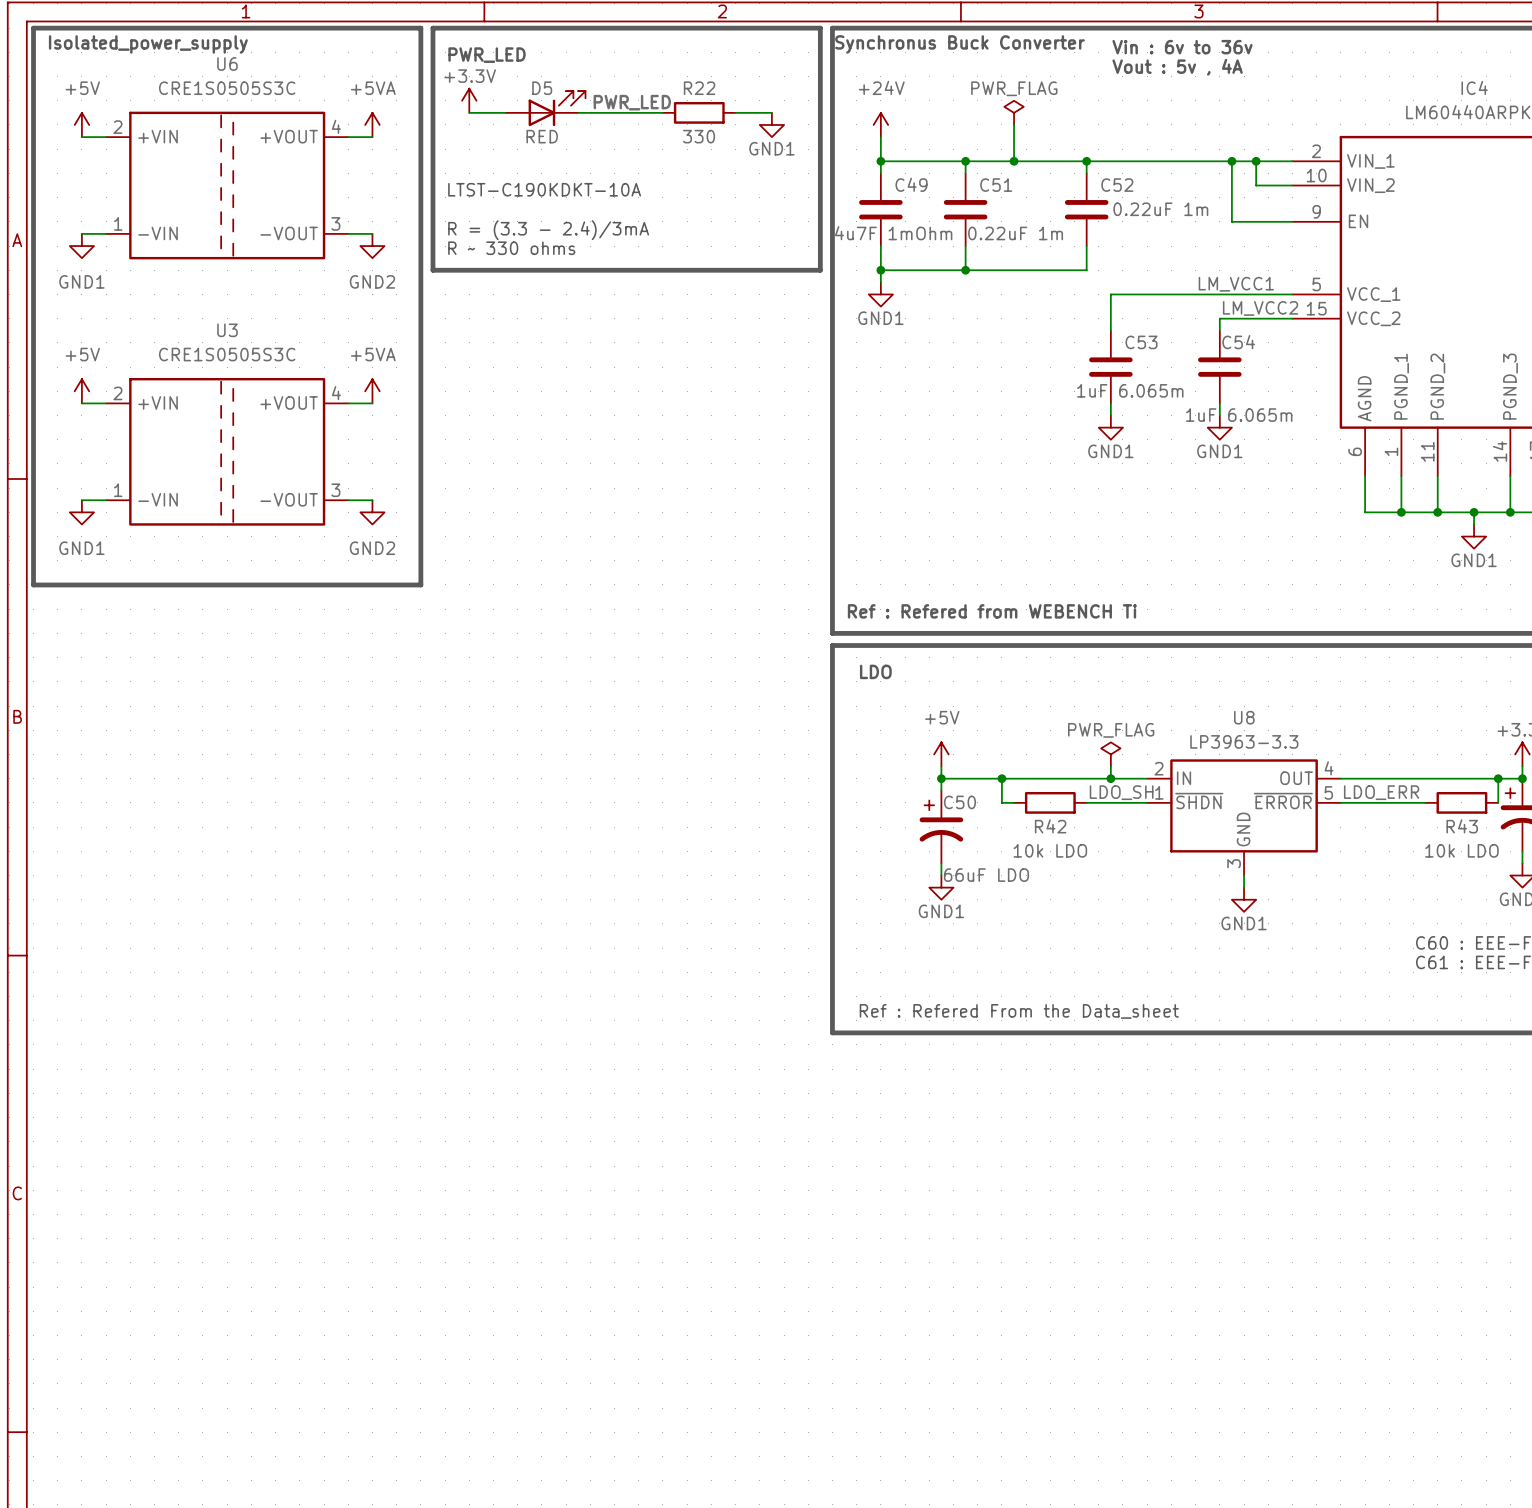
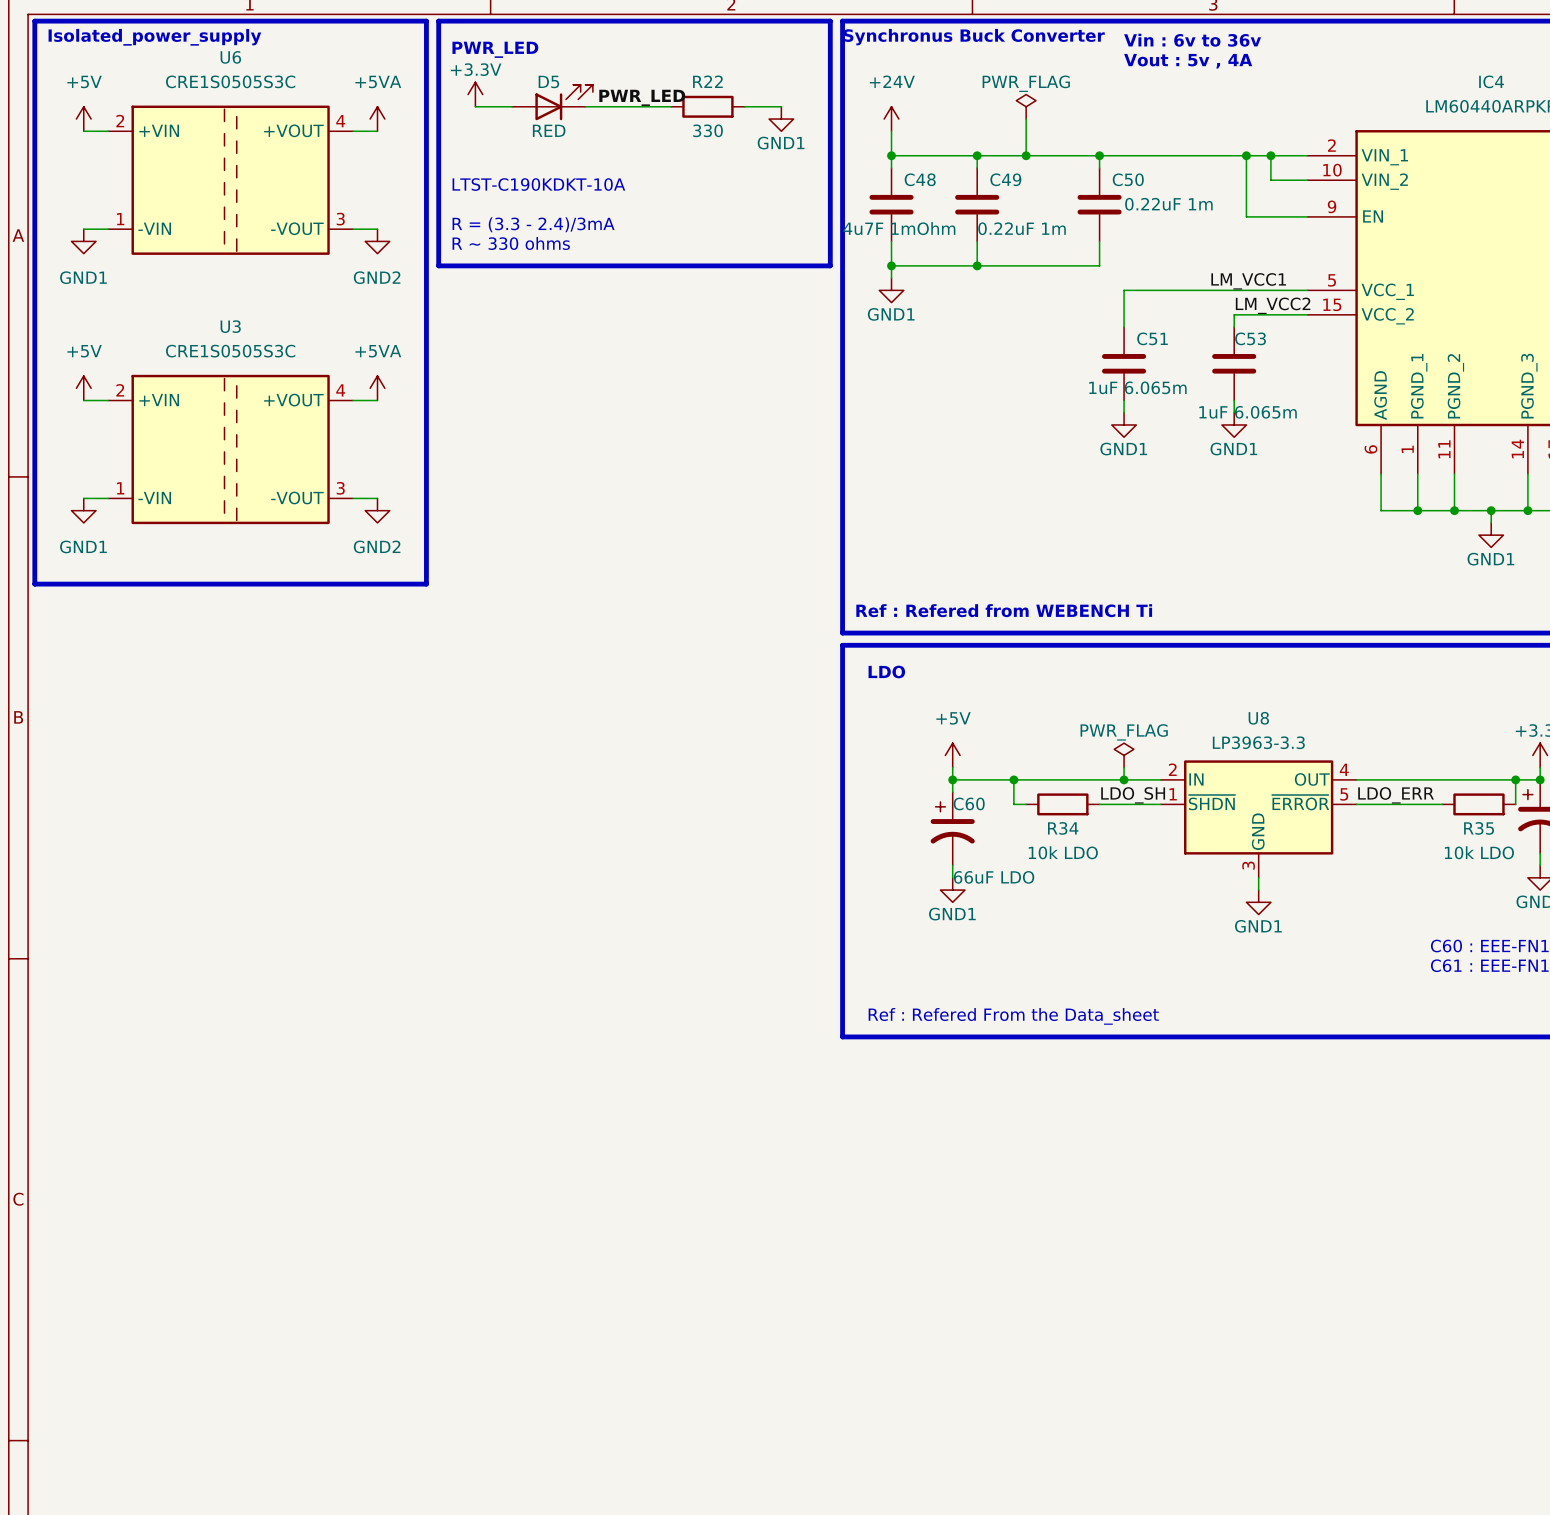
C49 name: C49 (911, 184) -> C48 (920, 179)
C51 name: C51 (996, 185) -> C49 (1005, 179)
C52 name: C52 (1117, 185) -> C50 (1128, 179)
C53 name: C53 (1141, 342) -> C51 (1152, 338)
C54 name: C54 (1238, 342) -> C53 (1250, 338)
C50 name: C50 (959, 802) -> C60 (969, 803)
R42 name: R42 (1050, 826) -> R34 (1063, 828)
R43 name: R43 (1462, 826) -> R35 (1479, 828)

